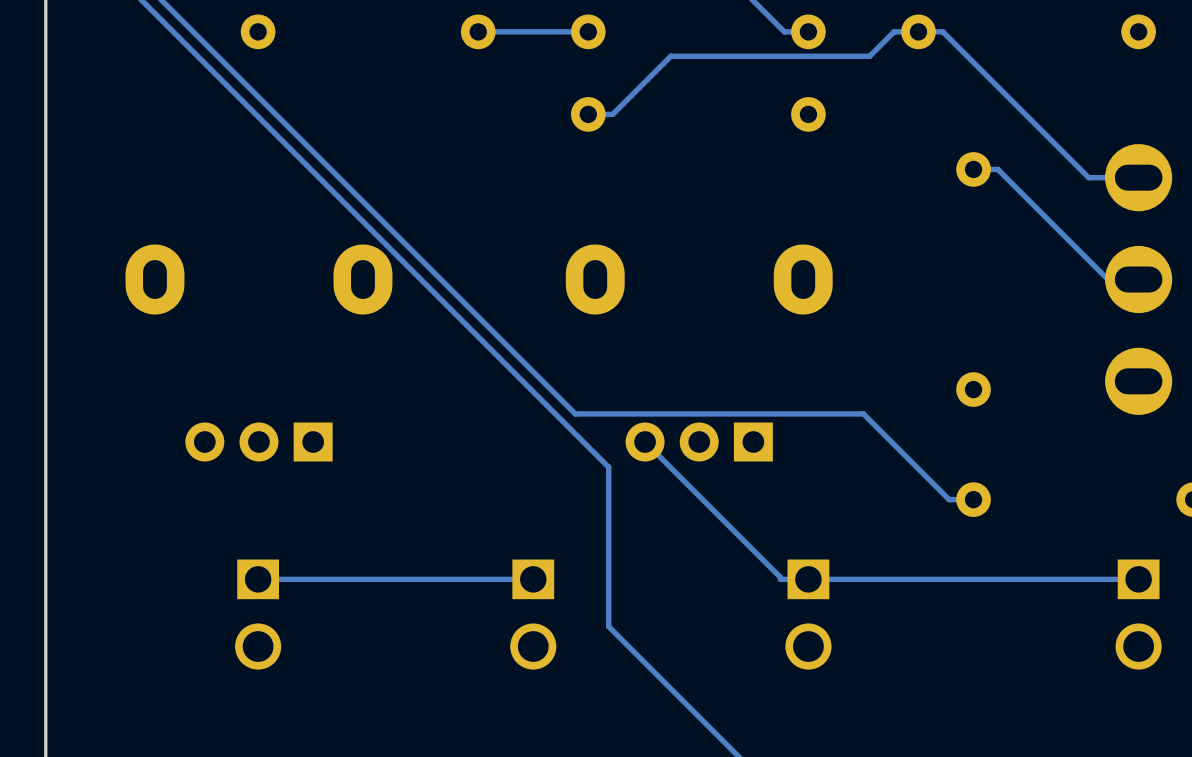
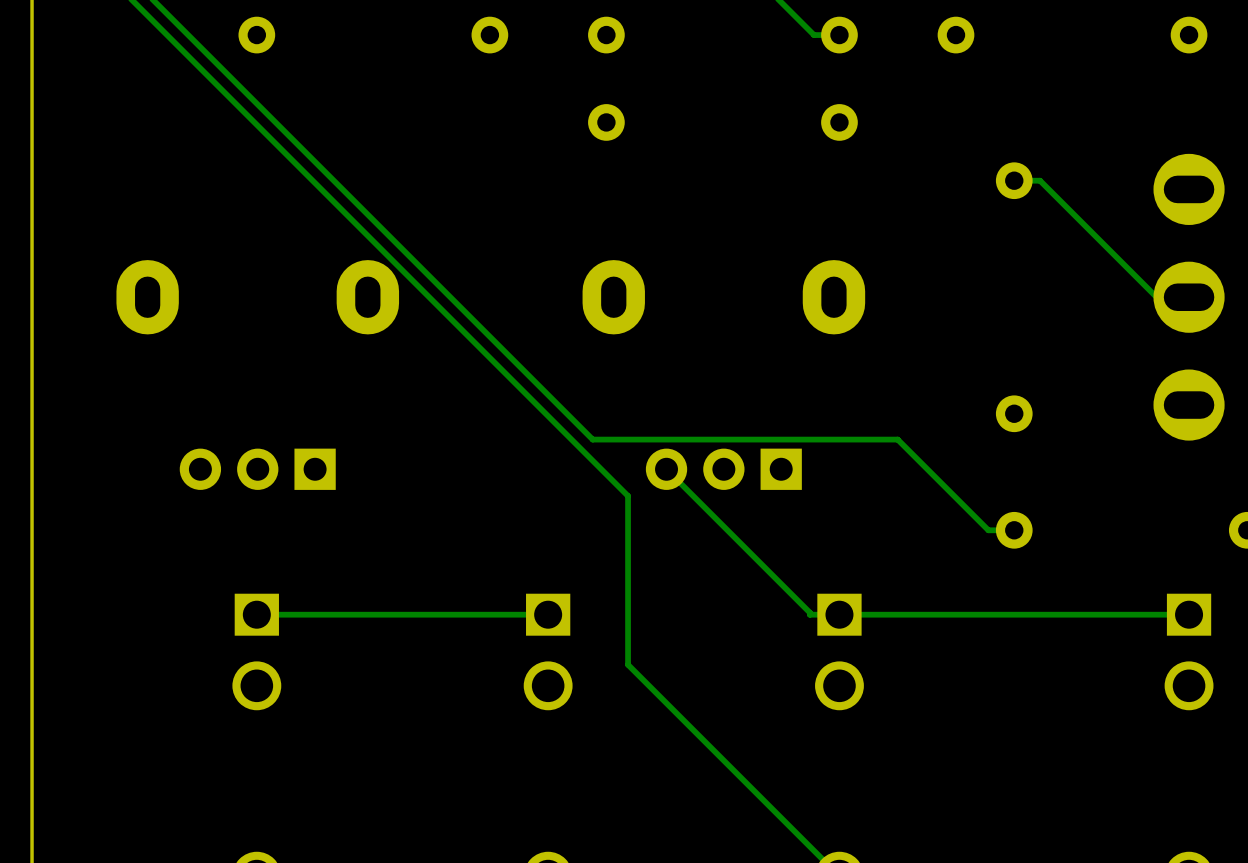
track: (588, 31) (478, 31) -> none
track: (588, 114) (612, 114) (670, 56) (869, 56) (894, 31) (942, 31) (1088, 177) (1138, 177) -> none

